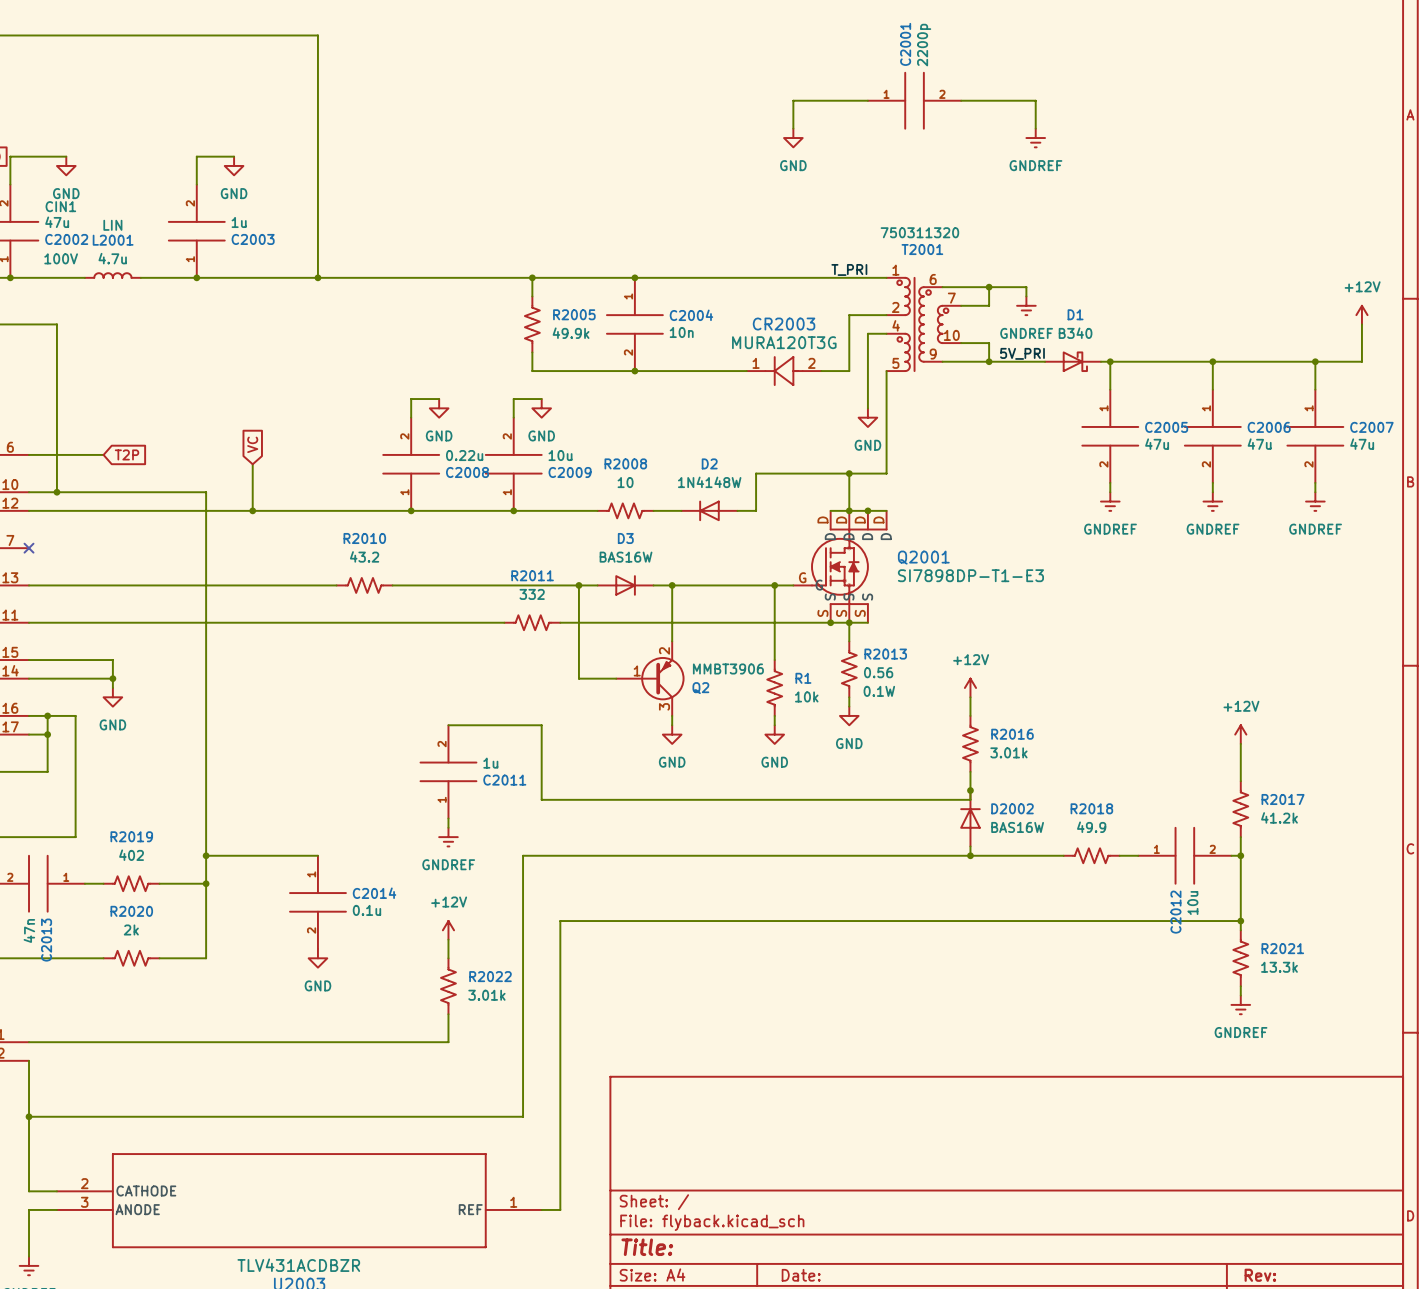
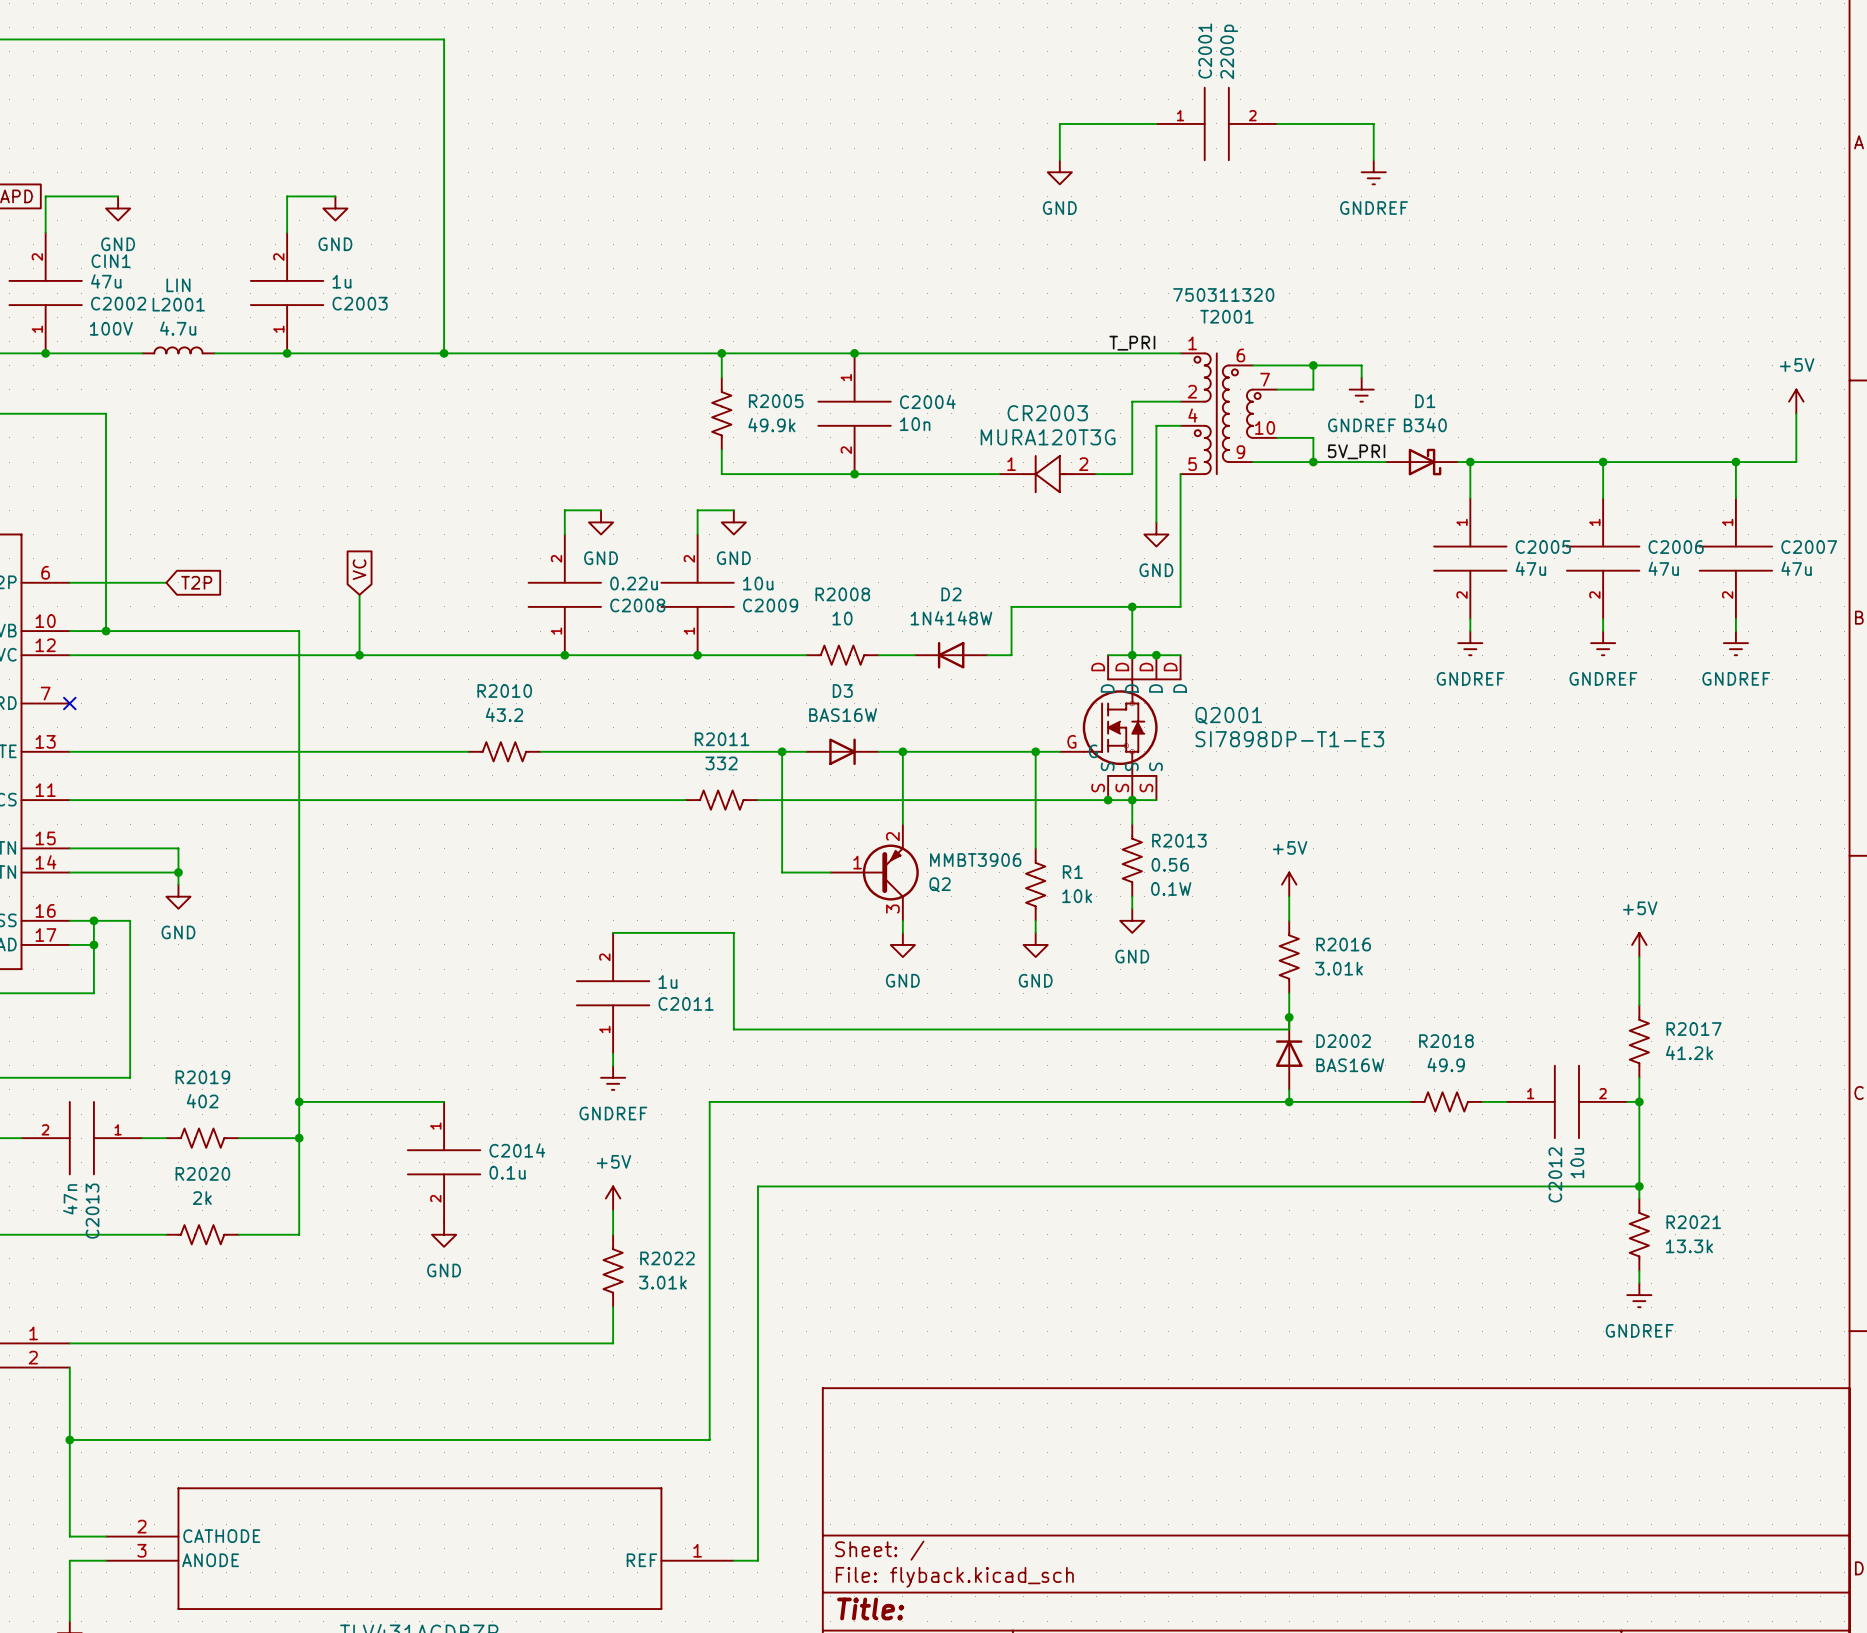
power symbol: +12V (1361, 315) -> +5V (1796, 401)
power symbol: +12V (970, 687) -> +5V (1289, 884)
power symbol: +12V (1240, 734) -> +5V (1639, 944)
power symbol: +12V (448, 930) -> +5V (613, 1198)

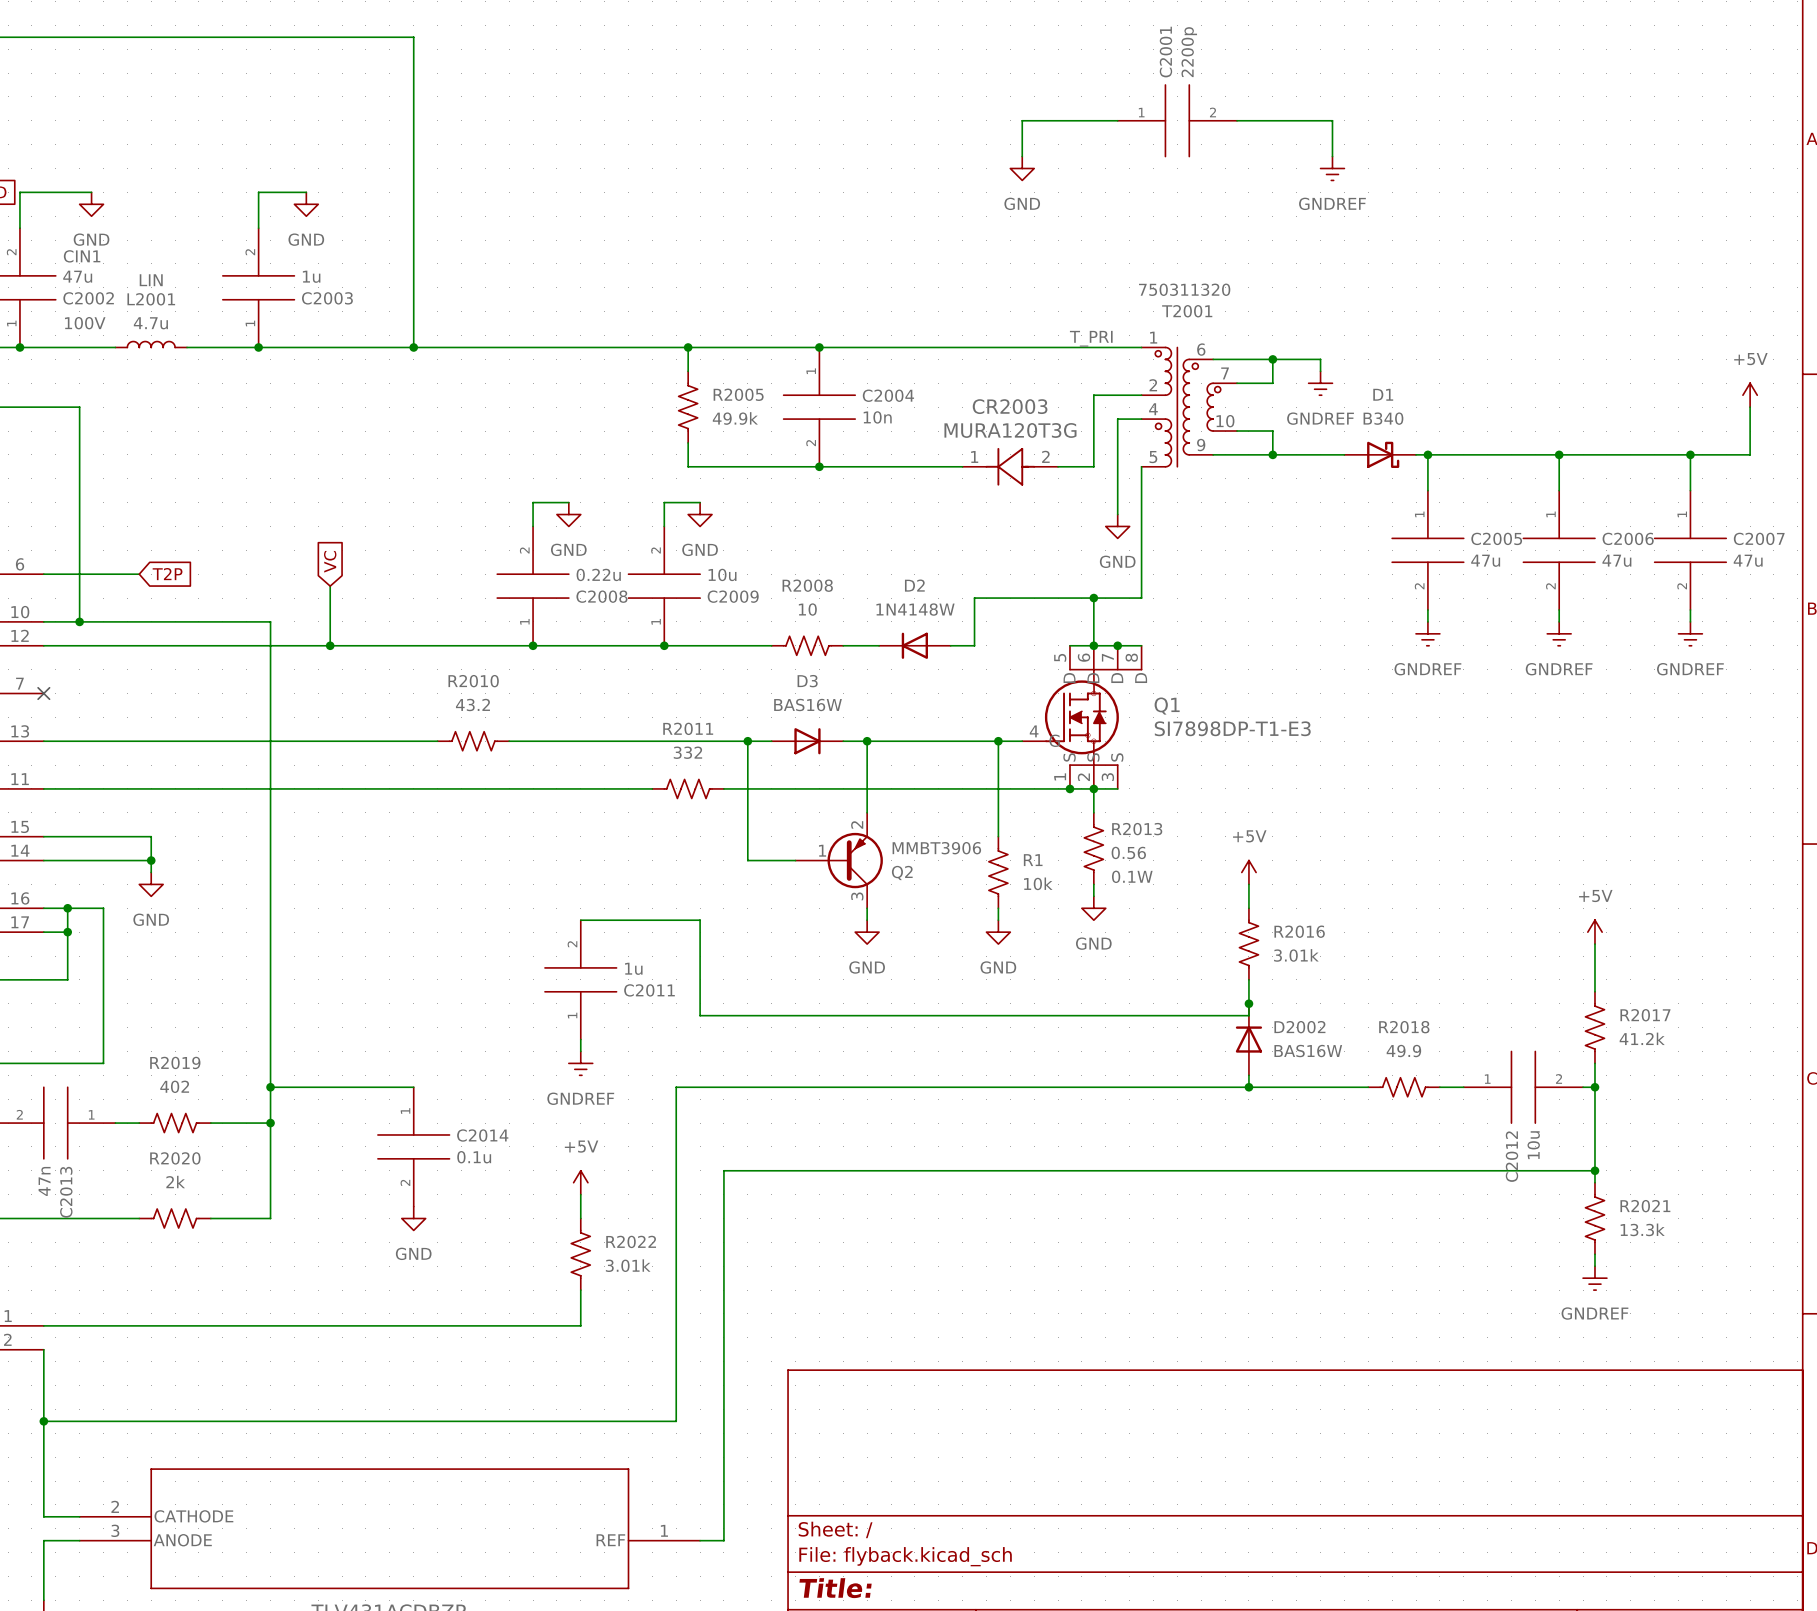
label: 5V_PRI (1356, 451) -> none
Q2001 pin number: D (1098, 667) -> 5 (1060, 657)
Q2001 pin number: D (1122, 667) -> 6 (1084, 657)
Q2001 pin number: D (1146, 667) -> 7 (1107, 657)
Q2001 pin number: D (1170, 667) -> 8 (1131, 657)
Q2001 name: Q2001 (1228, 715) -> Q1 (1167, 706)
Q2001 pin number: G (1071, 741) -> 4 (1034, 731)
Q2001 pin number: S (1098, 788) -> 1 (1060, 776)
Q2001 pin number: S (1122, 788) -> 2 (1083, 777)
Q2001 pin number: S (1146, 788) -> 3 (1107, 777)

